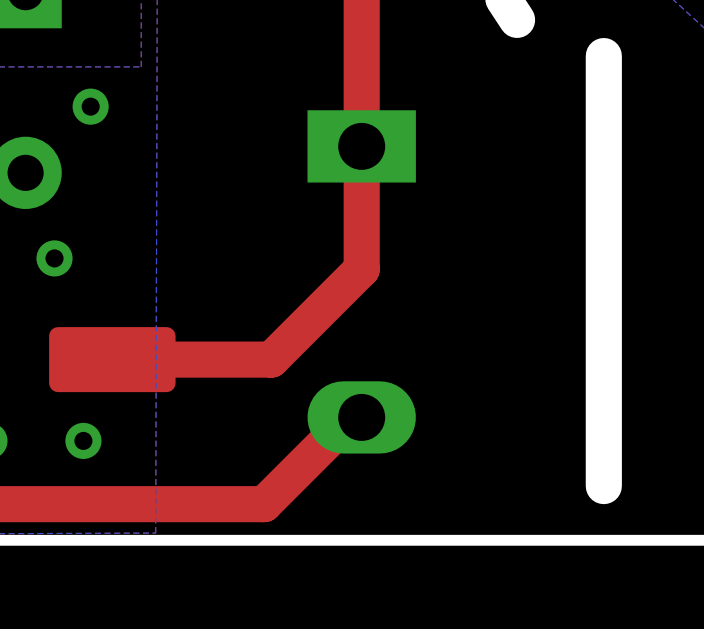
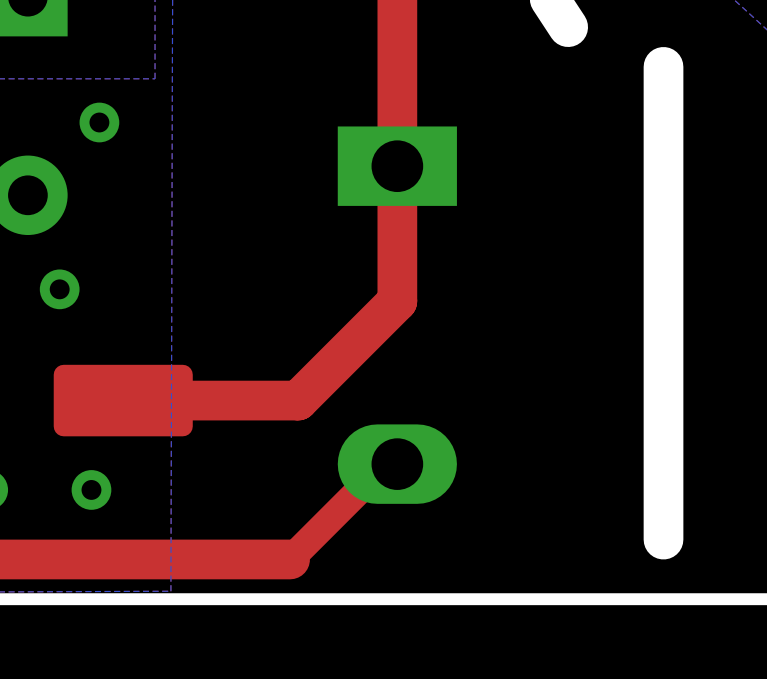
top track width: thick (361, 417) (350, 417) (264, 504) -> thin (397, 464) (385, 464) (290, 559)

